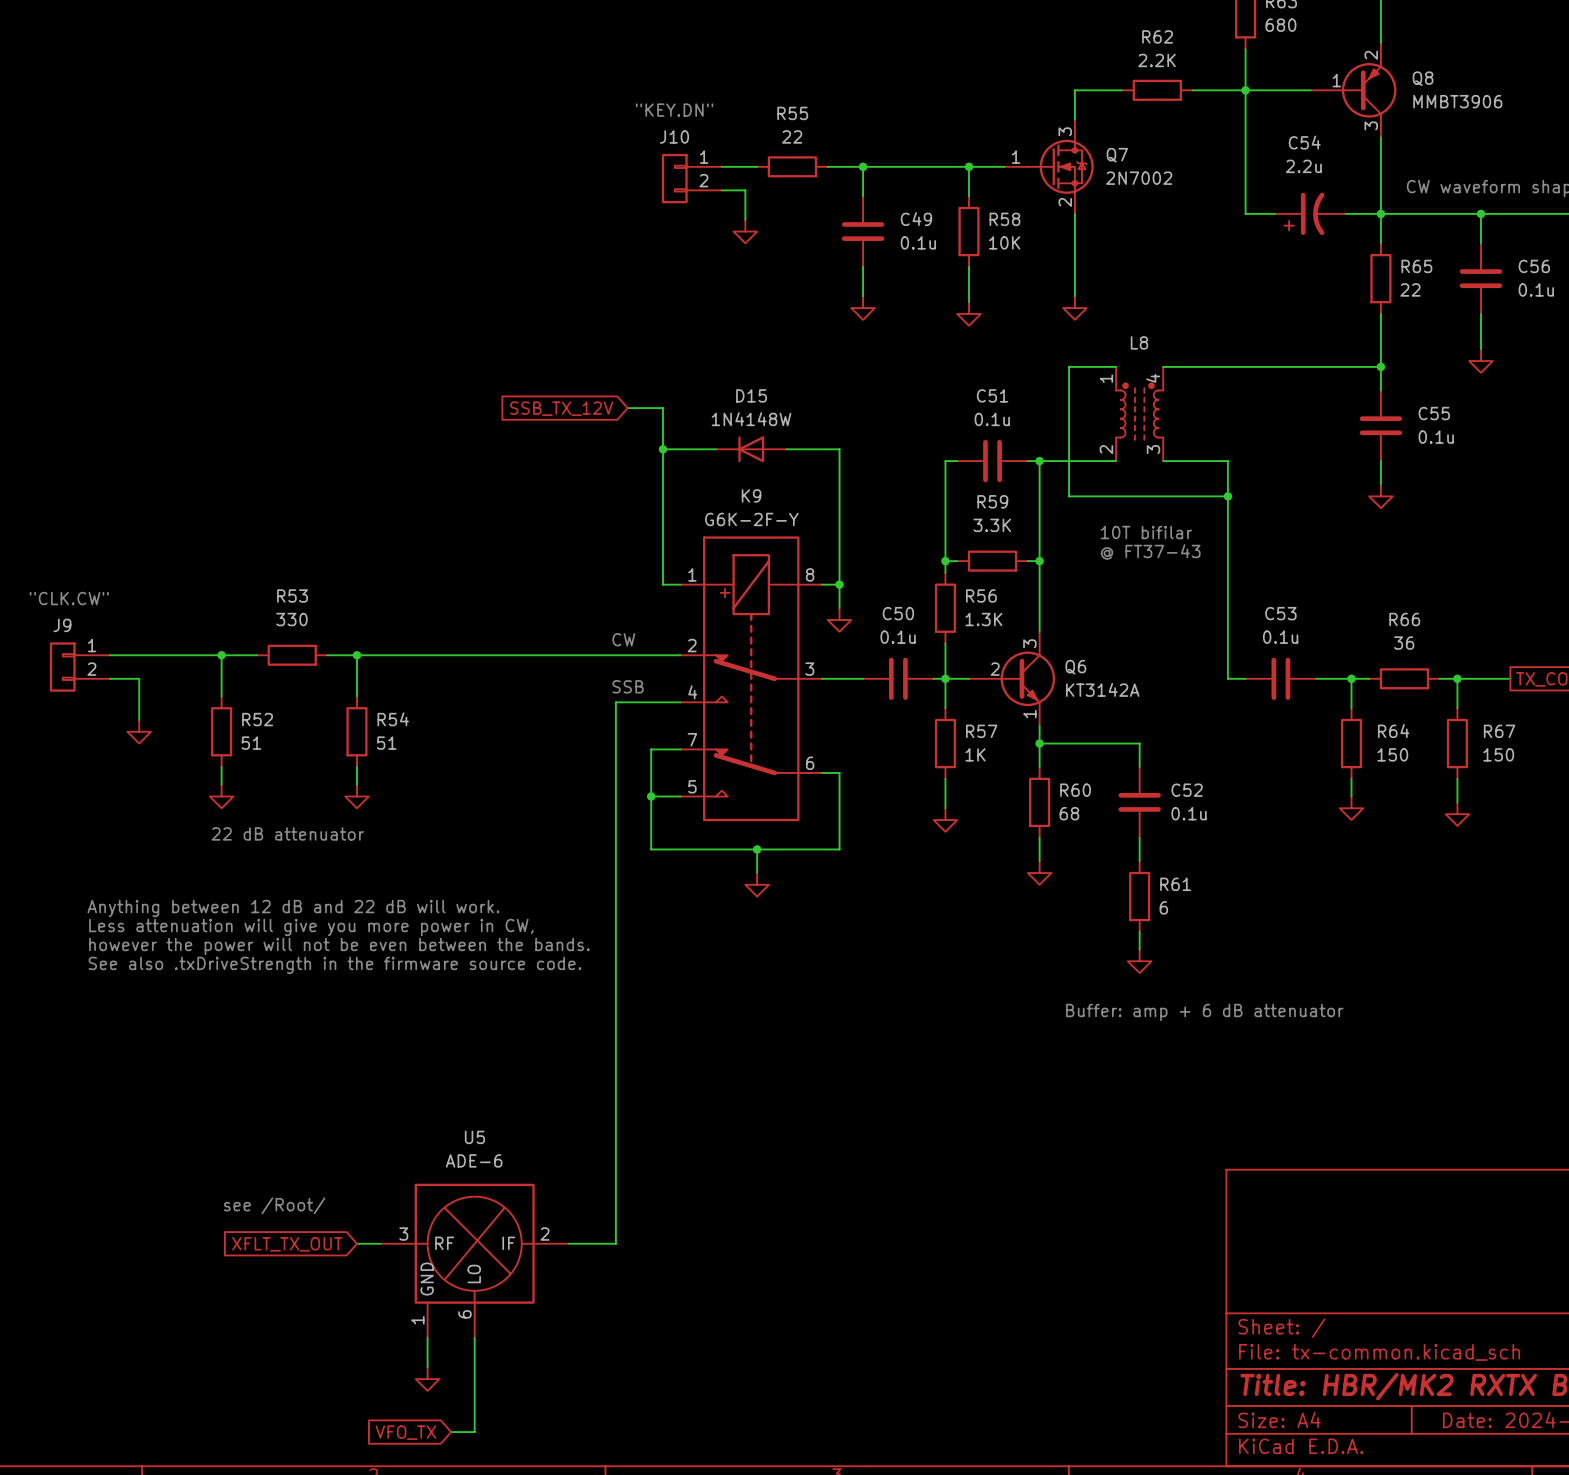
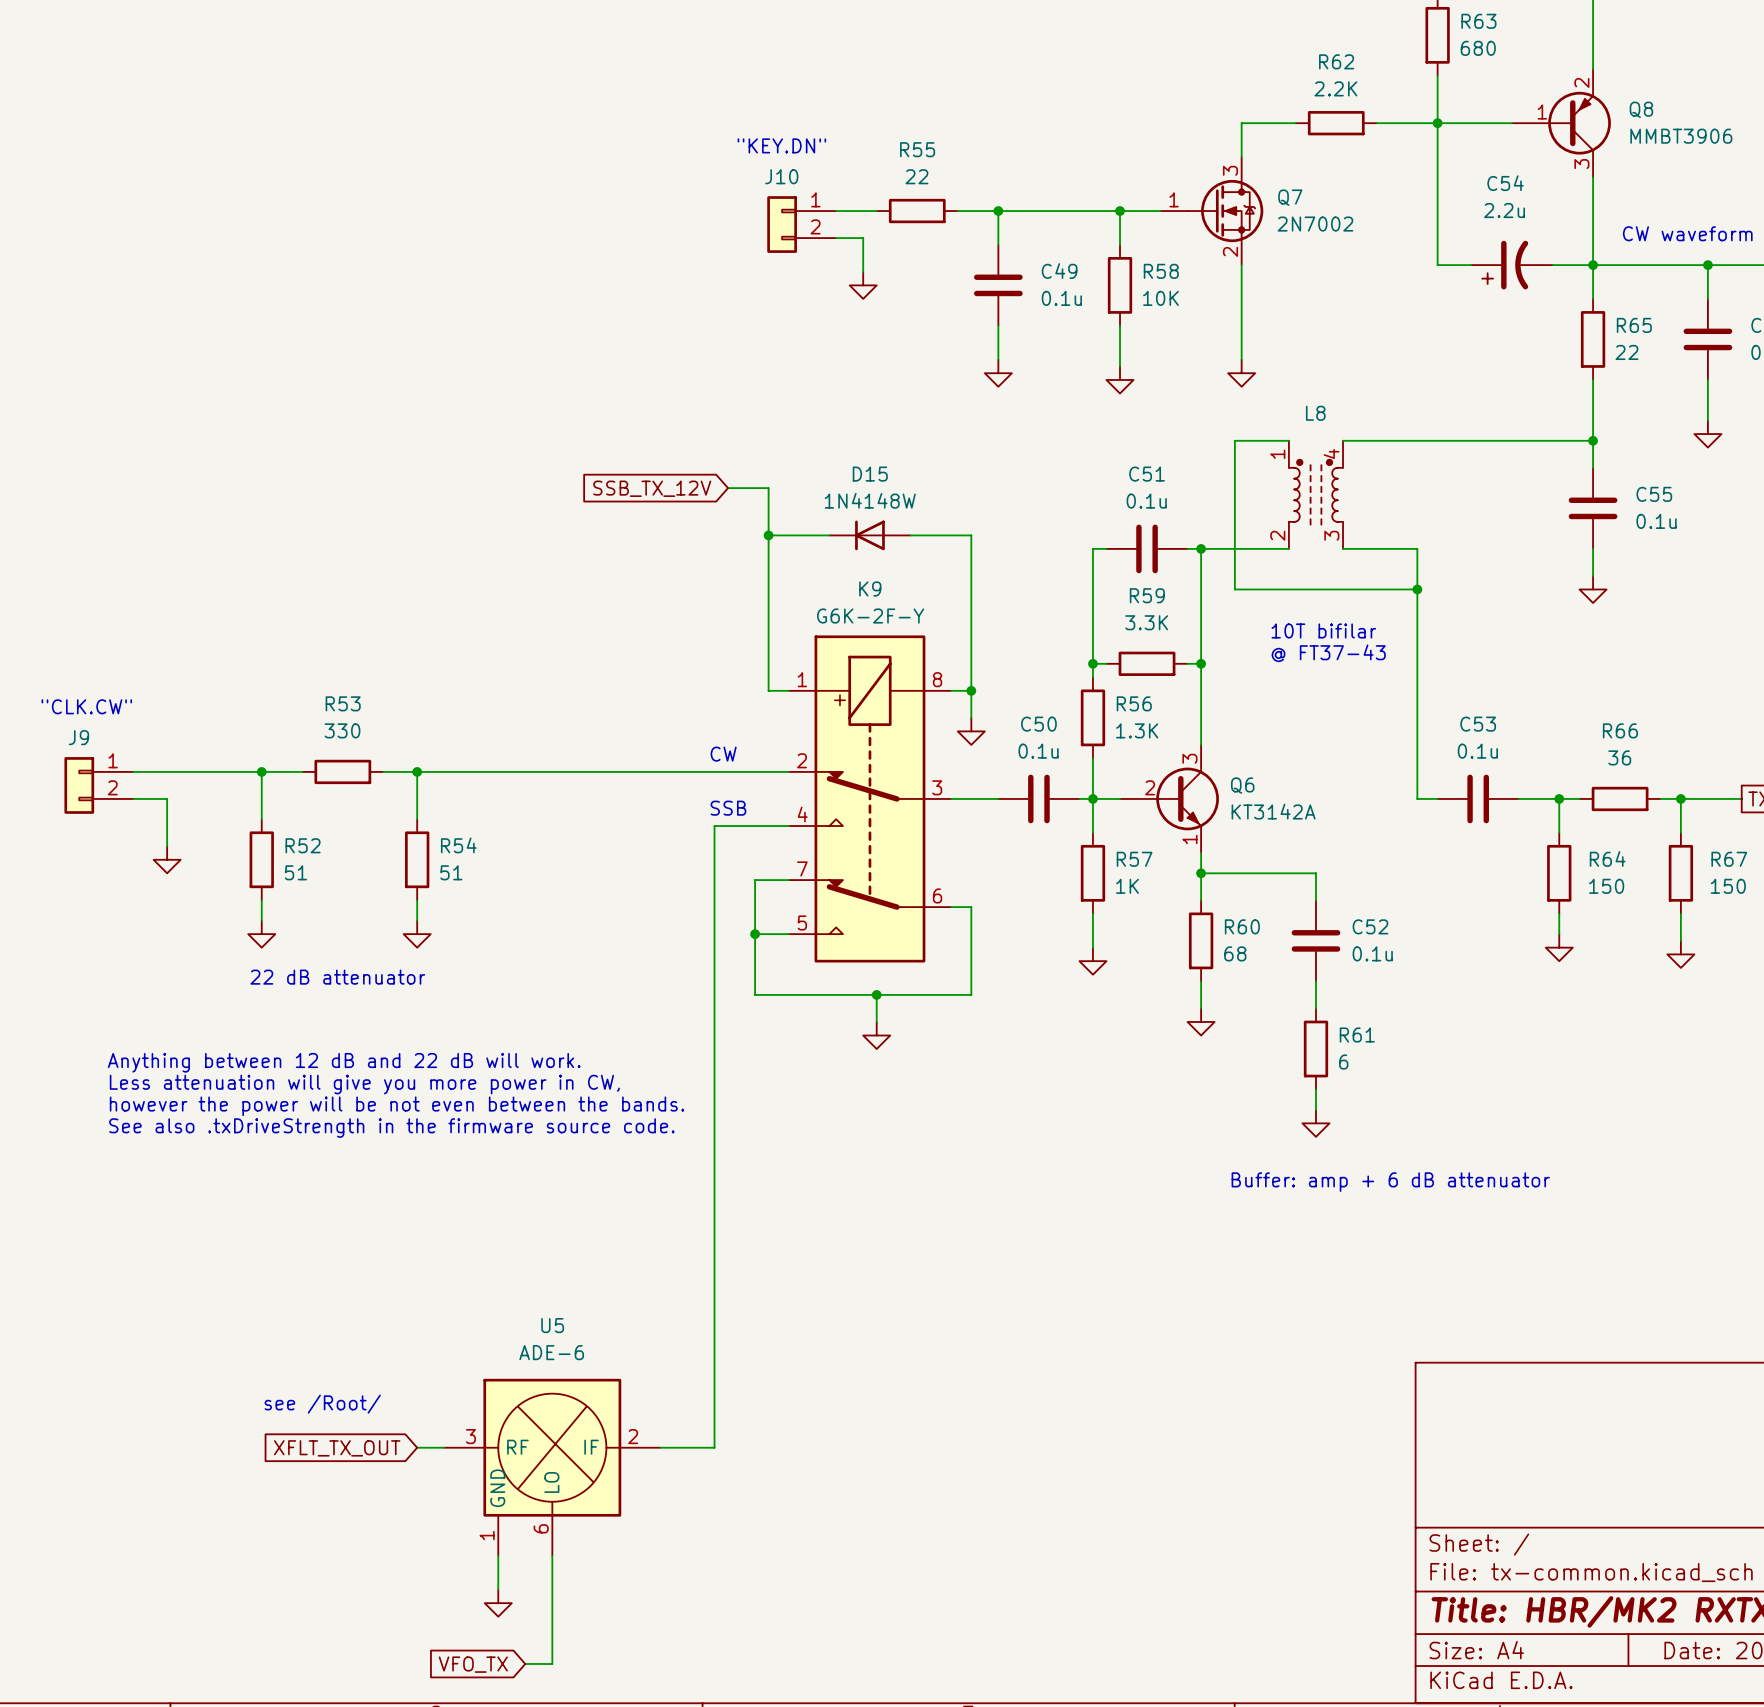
text: however the power will not be even between the bands. (339, 946) -> however the power will be not even between the bands. (397, 1106)

